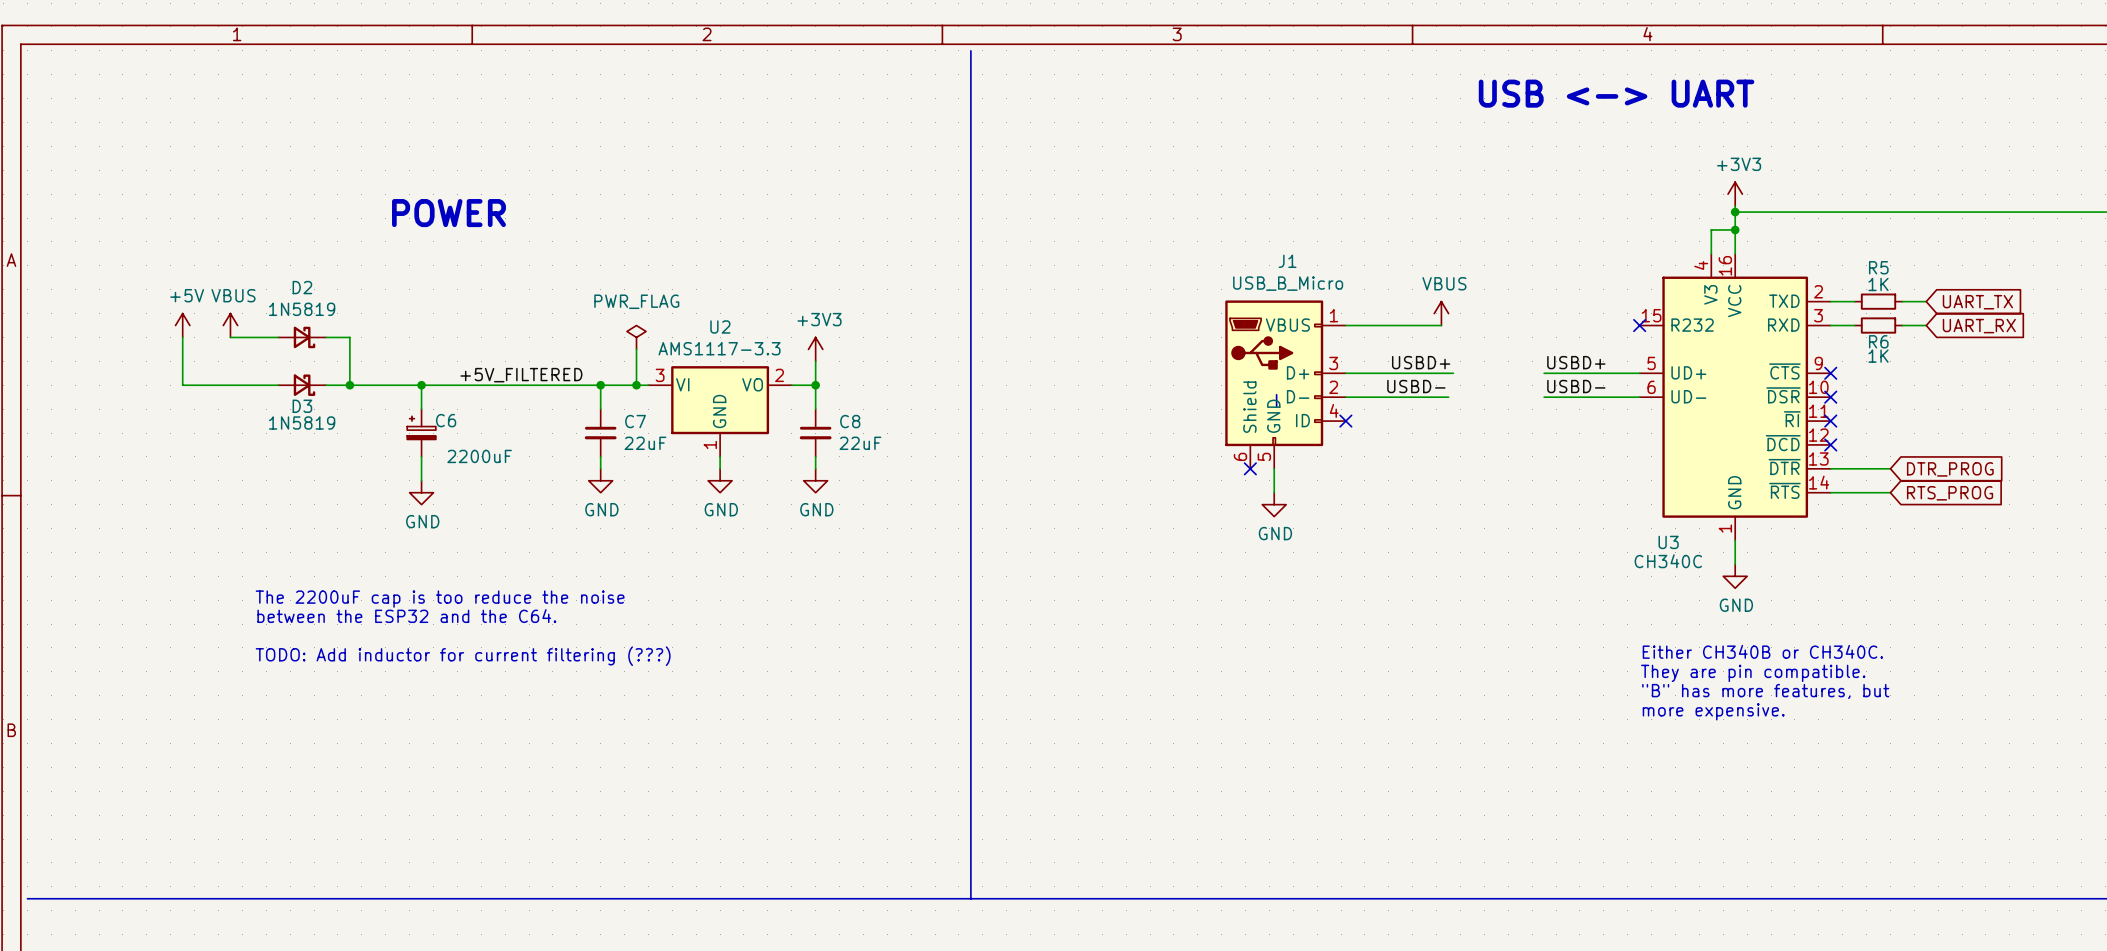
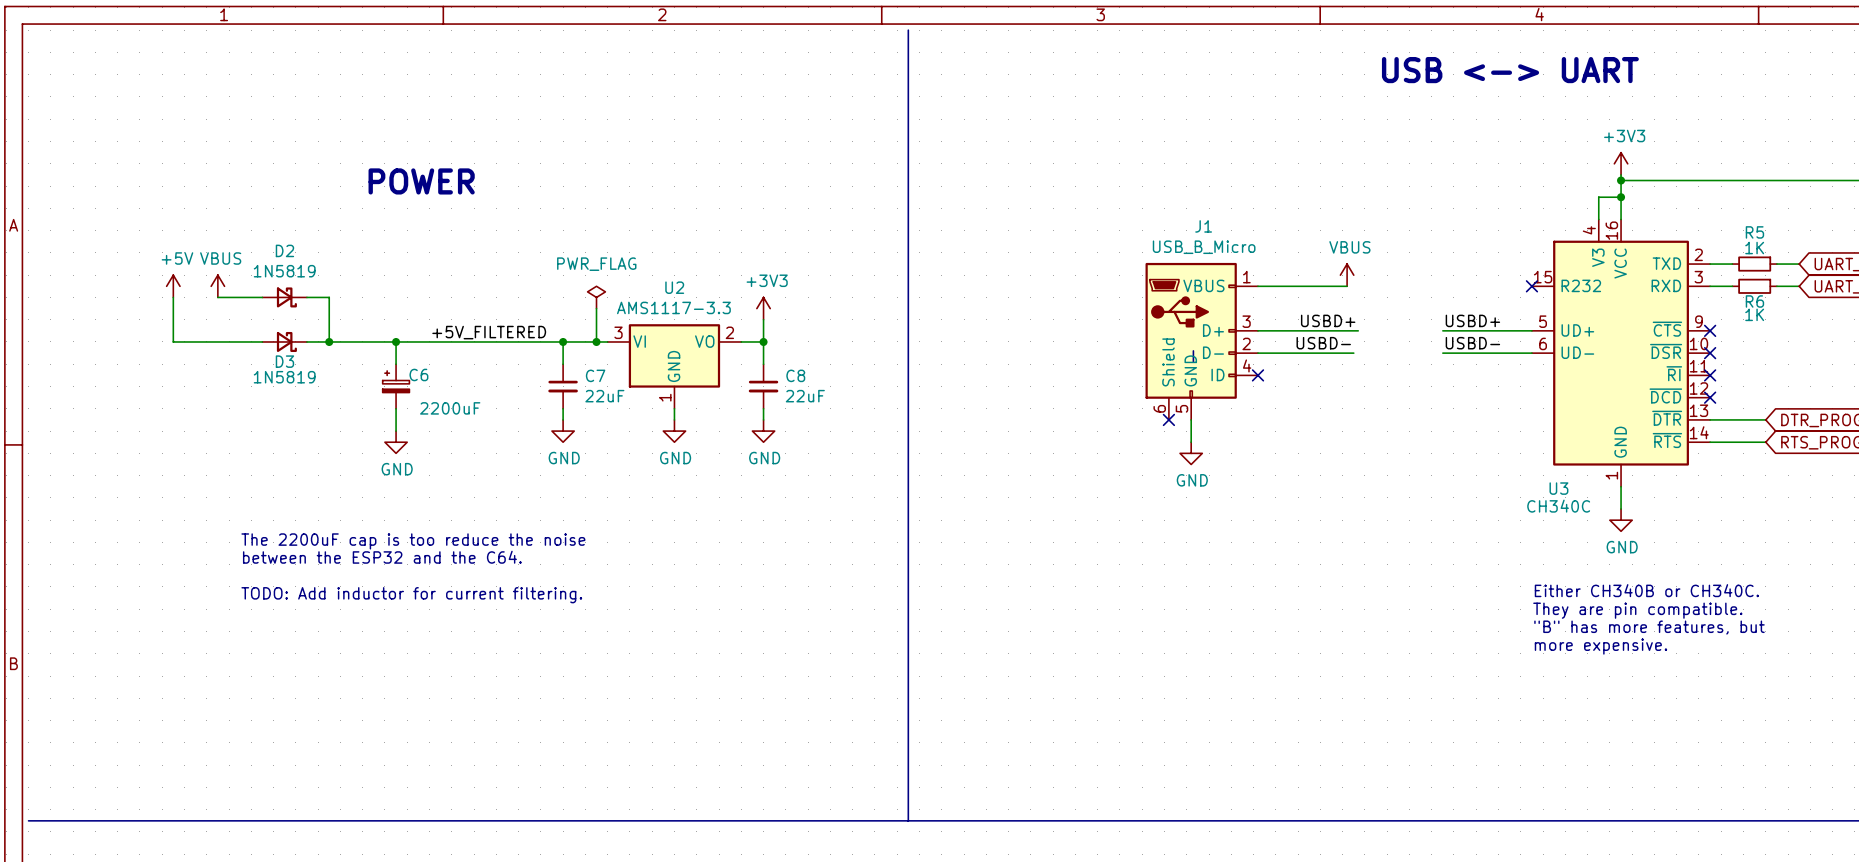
text: TODO: Add inductor for current filtering (???) (463, 656) -> TODO: Add inductor for current filtering. (411, 595)

